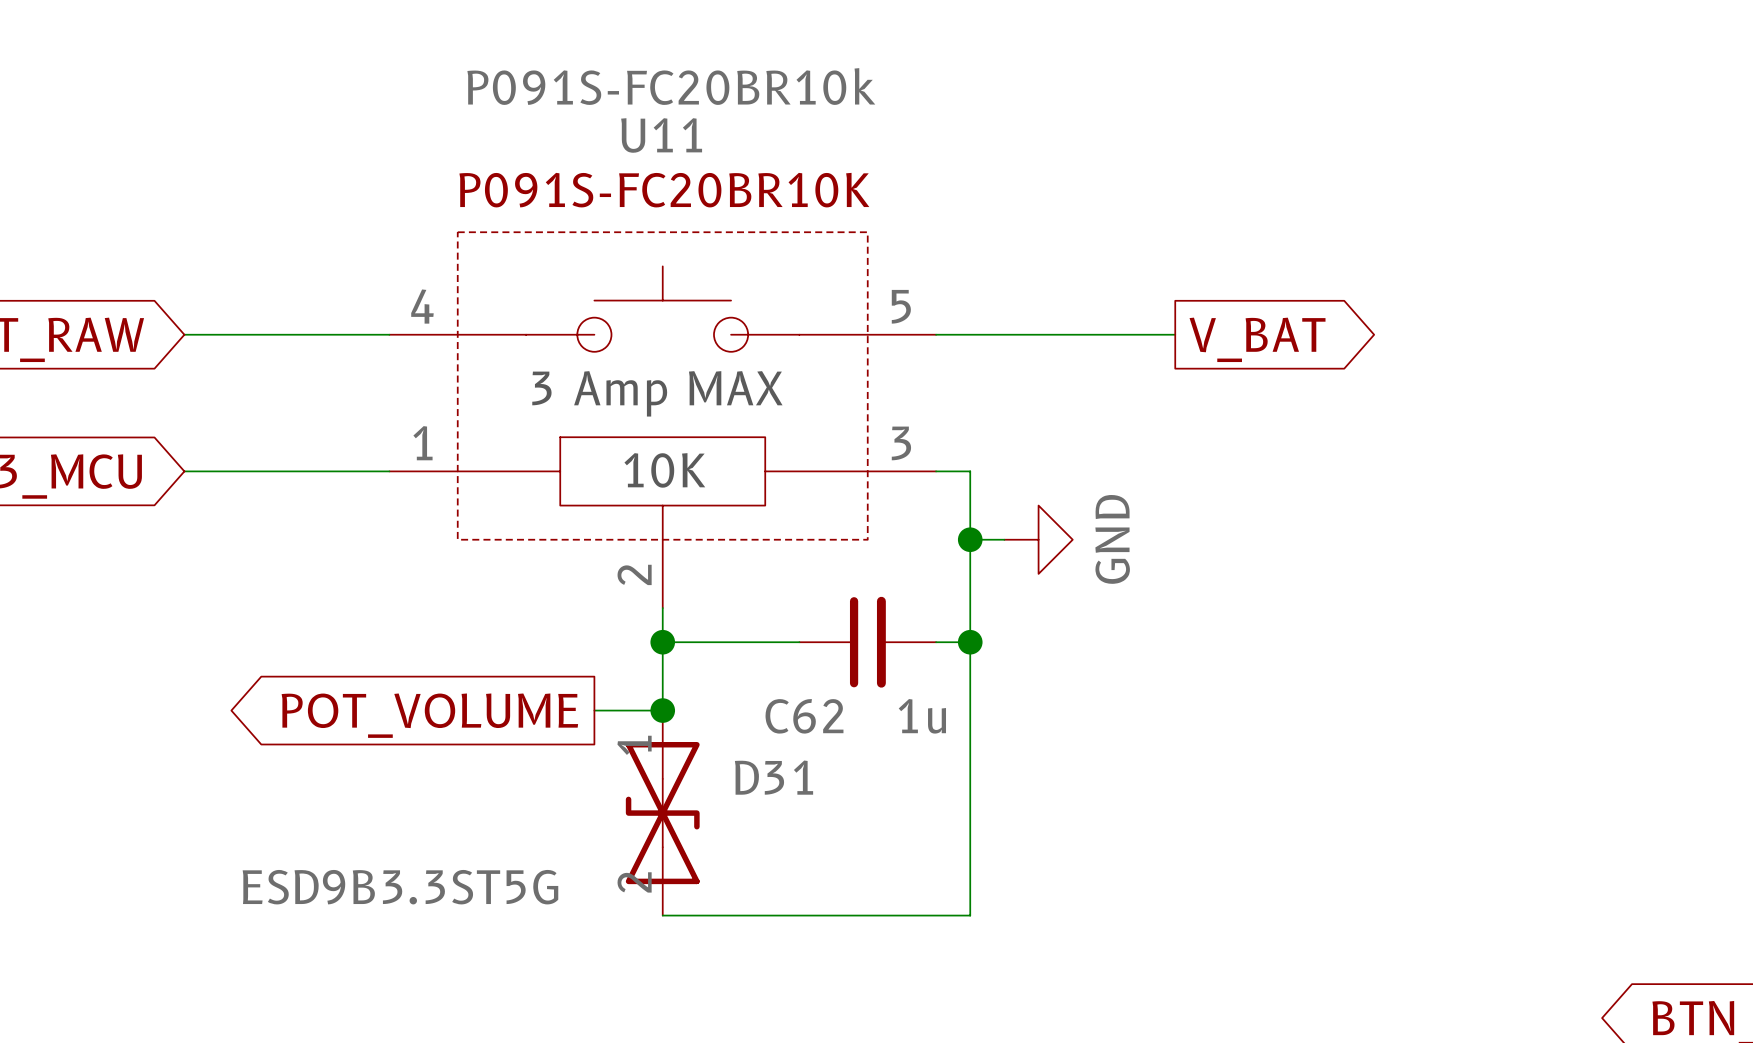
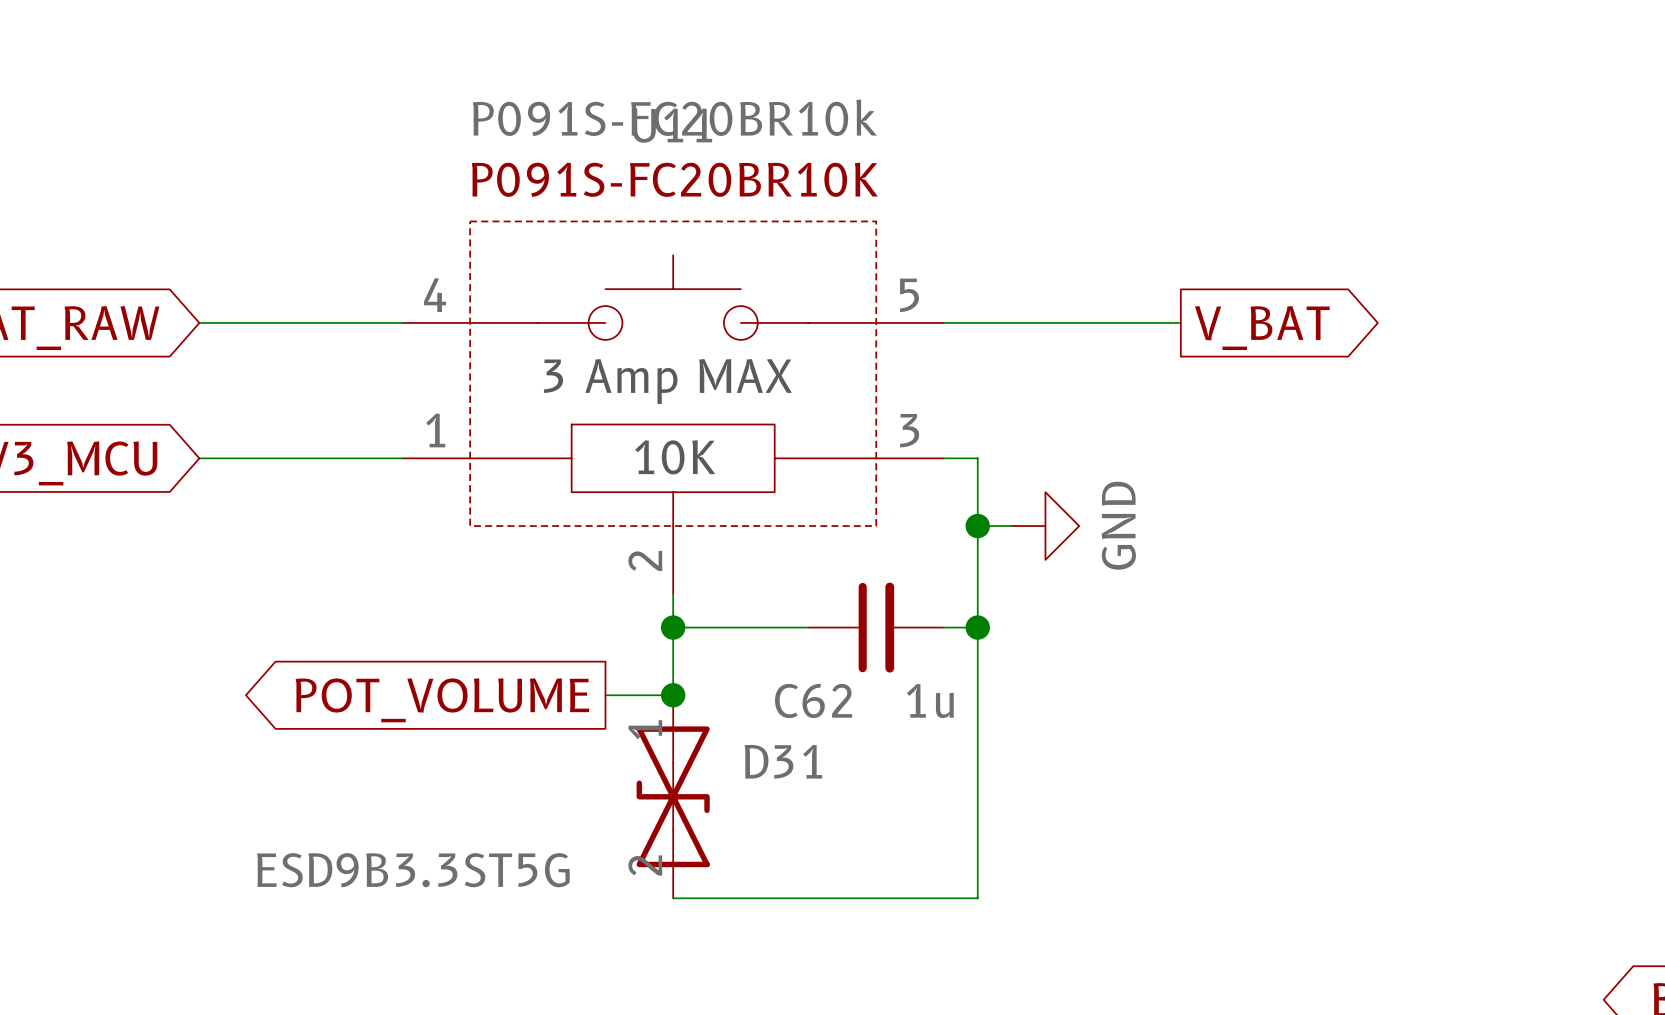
U11 value position: P091S-FC20BR10k (671, 86) -> P091S-FC20BR10k (674, 117)

